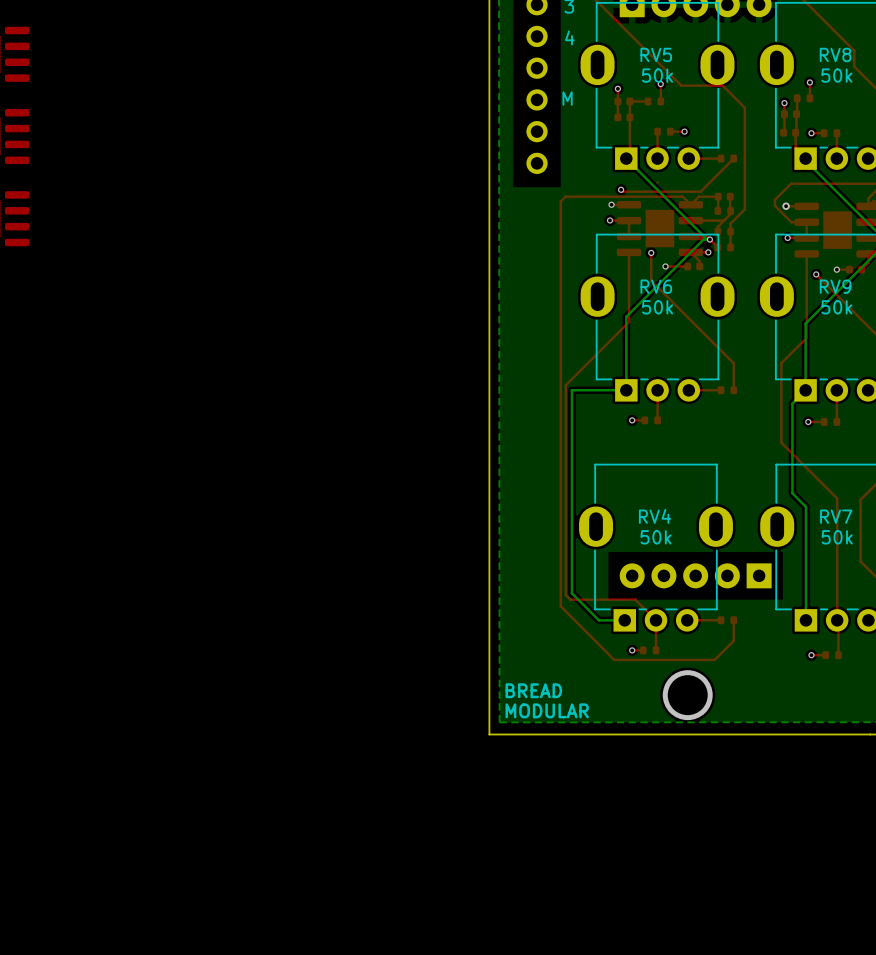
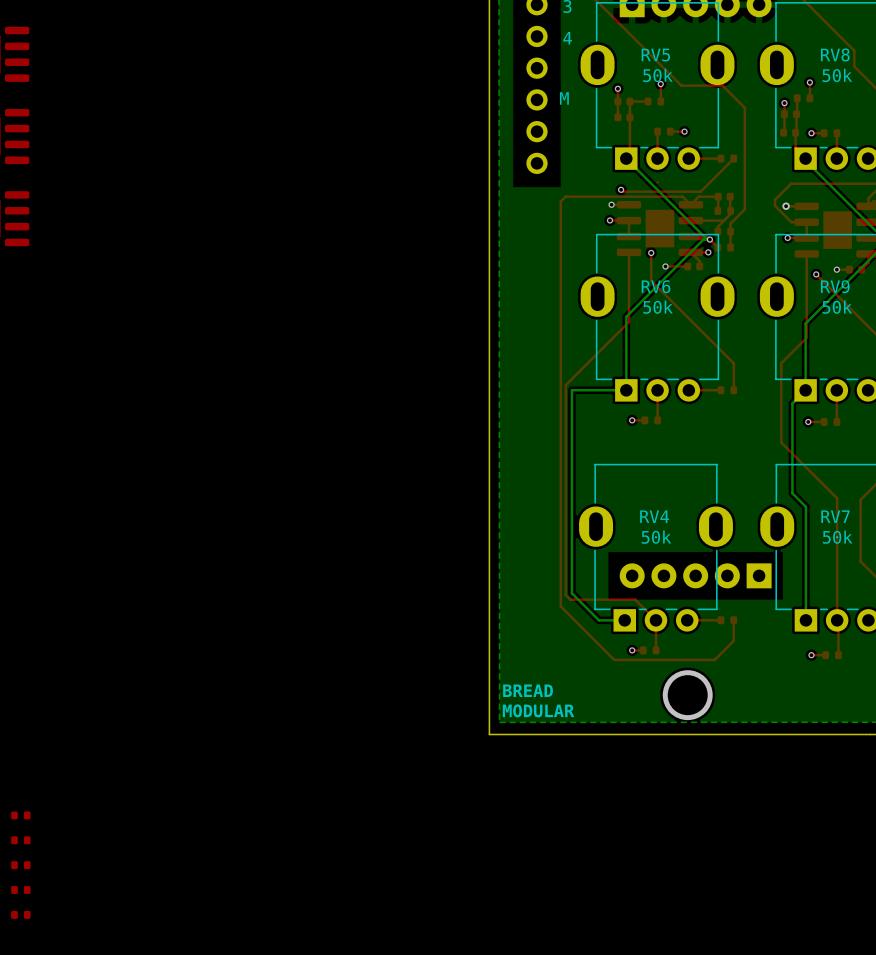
part: none -> (20, 815)
part: none -> (20, 840)
part: none -> (20, 865)
part: none -> (20, 890)
part: none -> (20, 914)

